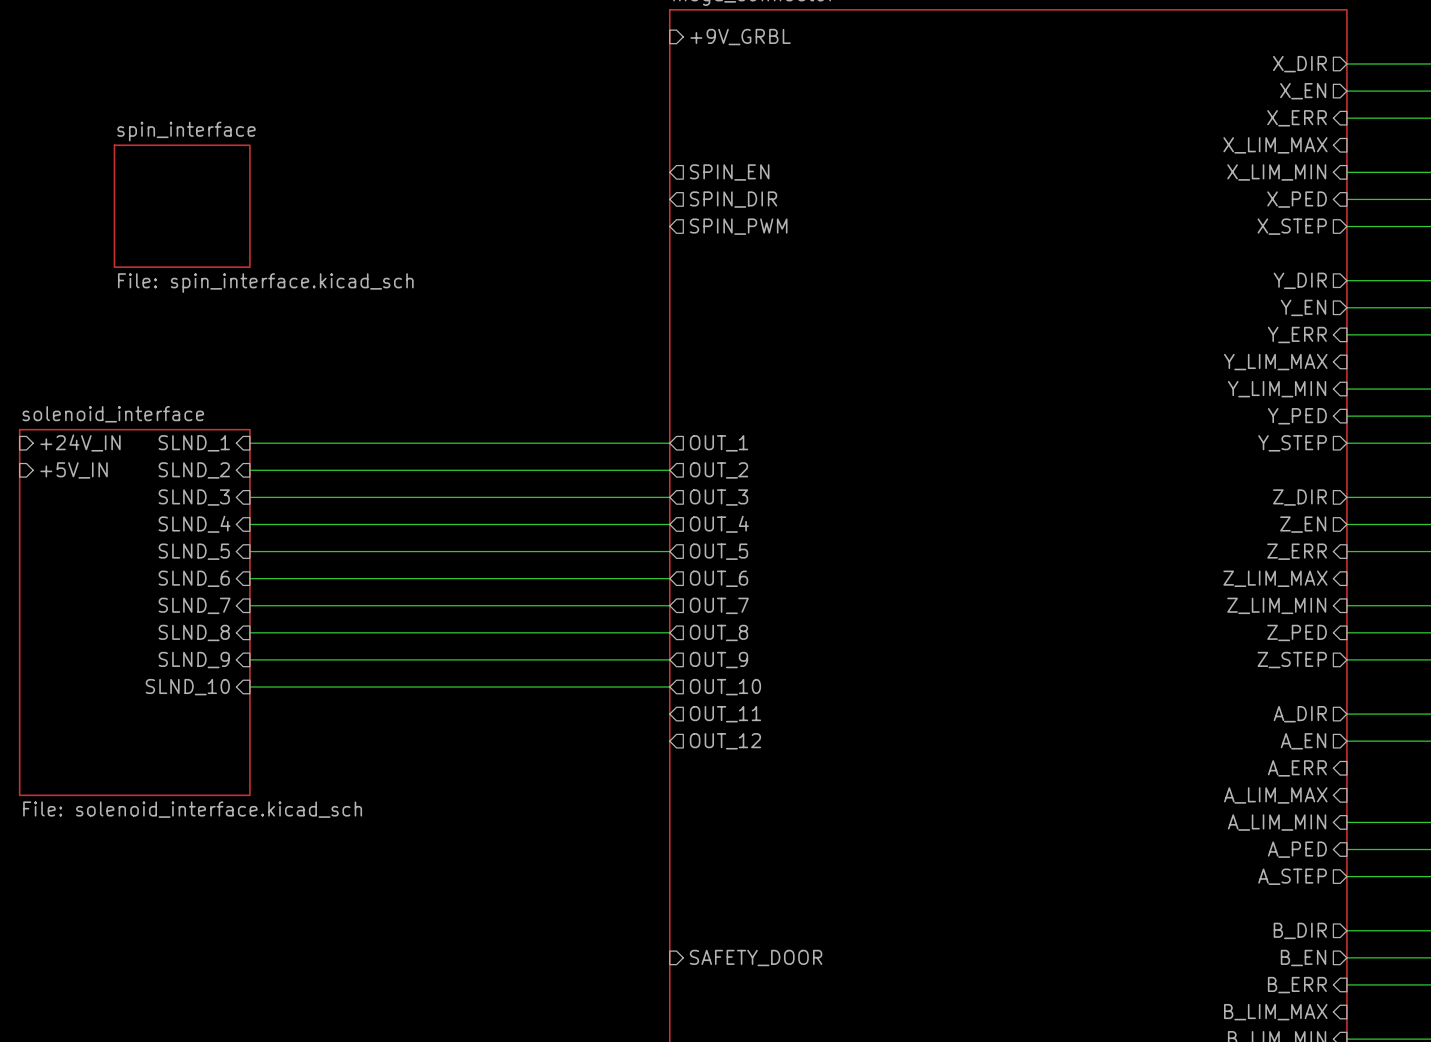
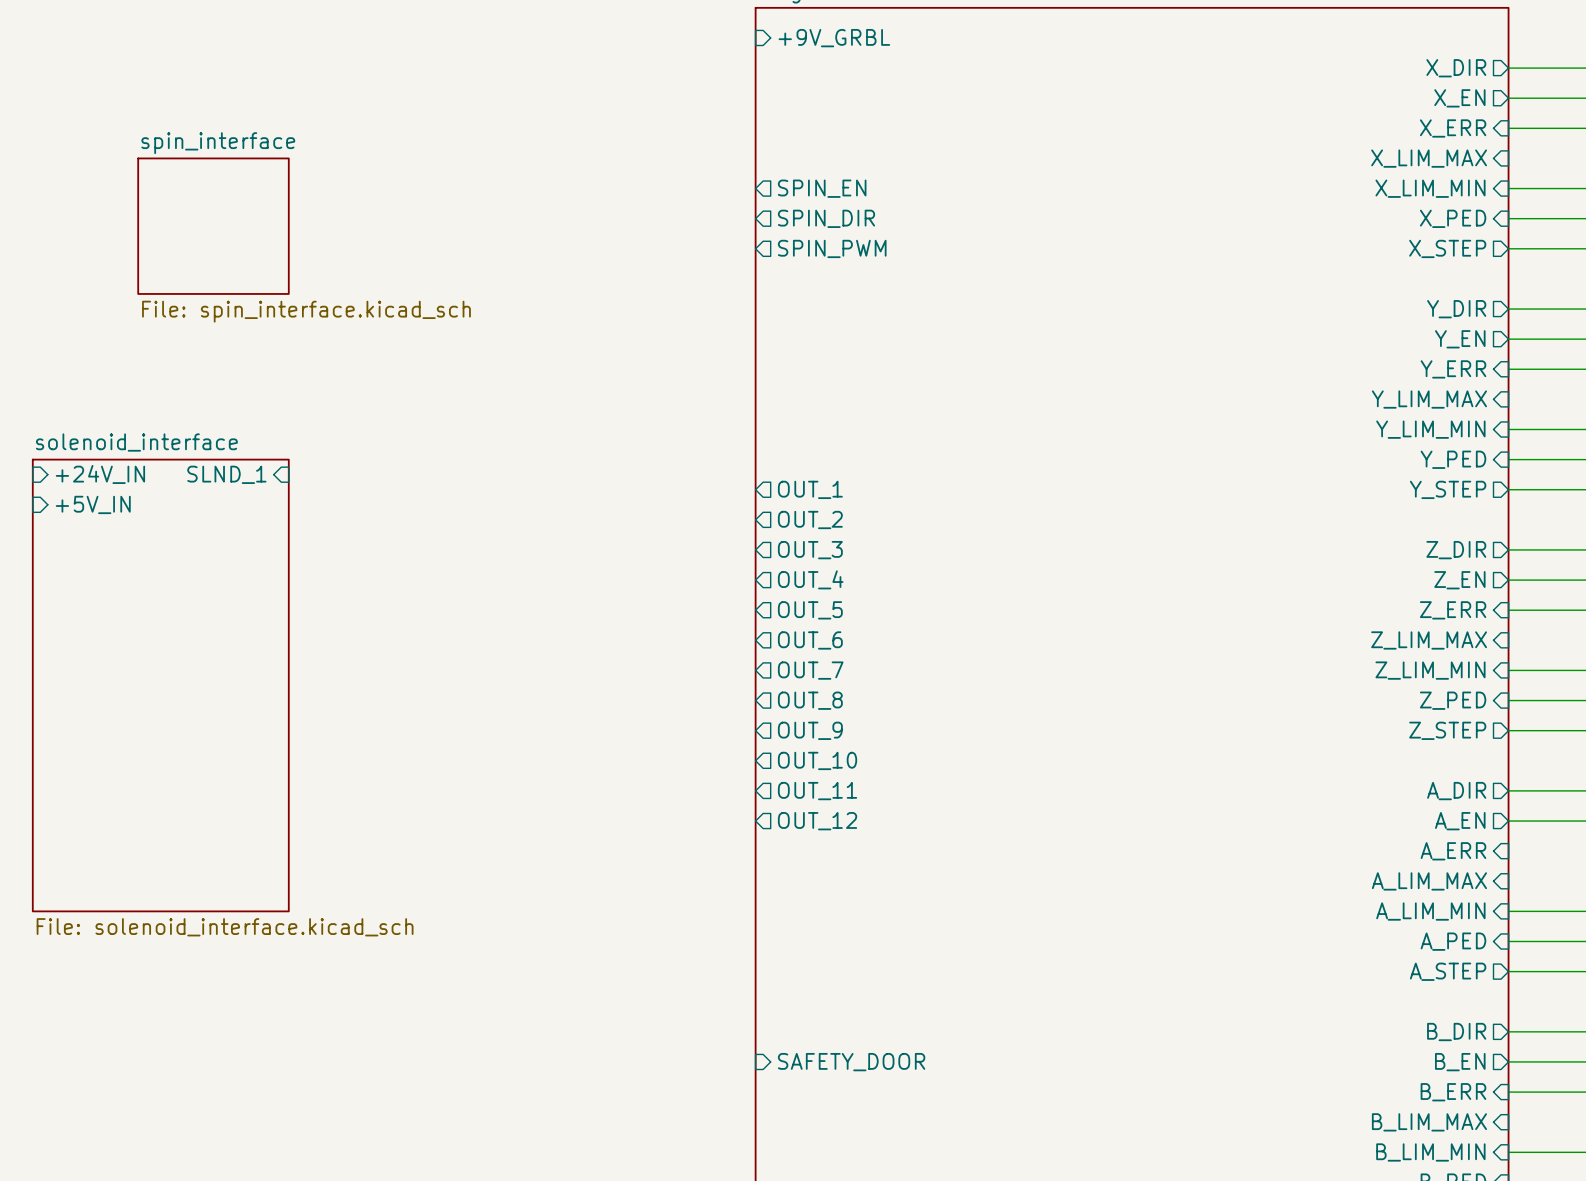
sheet solenoid_interface shape: [18, 428, 251, 797] -> [31, 458, 290, 913]
sheet pin position: +24V_IN (80, 443) -> +24V_IN (100, 474)
sheet pin position: SLND_1 (194, 443) -> SLND_1 (226, 474)
wire: (249, 443) (669, 443) -> none
sheet pin position: +5V_IN (74, 470) -> +5V_IN (93, 504)
sheet pin: SLND_2 (194, 470) -> none
wire: (249, 470) (669, 470) -> none
sheet pin: SLND_3 (194, 497) -> none
wire: (249, 497) (669, 497) -> none
sheet pin: SLND_4 (194, 524) -> none
wire: (249, 524) (669, 524) -> none
sheet pin: SLND_5 (194, 551) -> none
wire: (249, 551) (669, 551) -> none
sheet pin: SLND_6 (194, 578) -> none
wire: (249, 578) (669, 578) -> none
sheet pin: SLND_7 (194, 605) -> none
wire: (249, 605) (669, 605) -> none
sheet pin: SLND_8 (194, 632) -> none
wire: (249, 632) (669, 632) -> none
wire: (249, 659) (669, 659) -> none
sheet pin: SLND_9 (194, 660) -> none
wire: (249, 686) (669, 686) -> none
sheet pin: SLND_10 (187, 687) -> none

